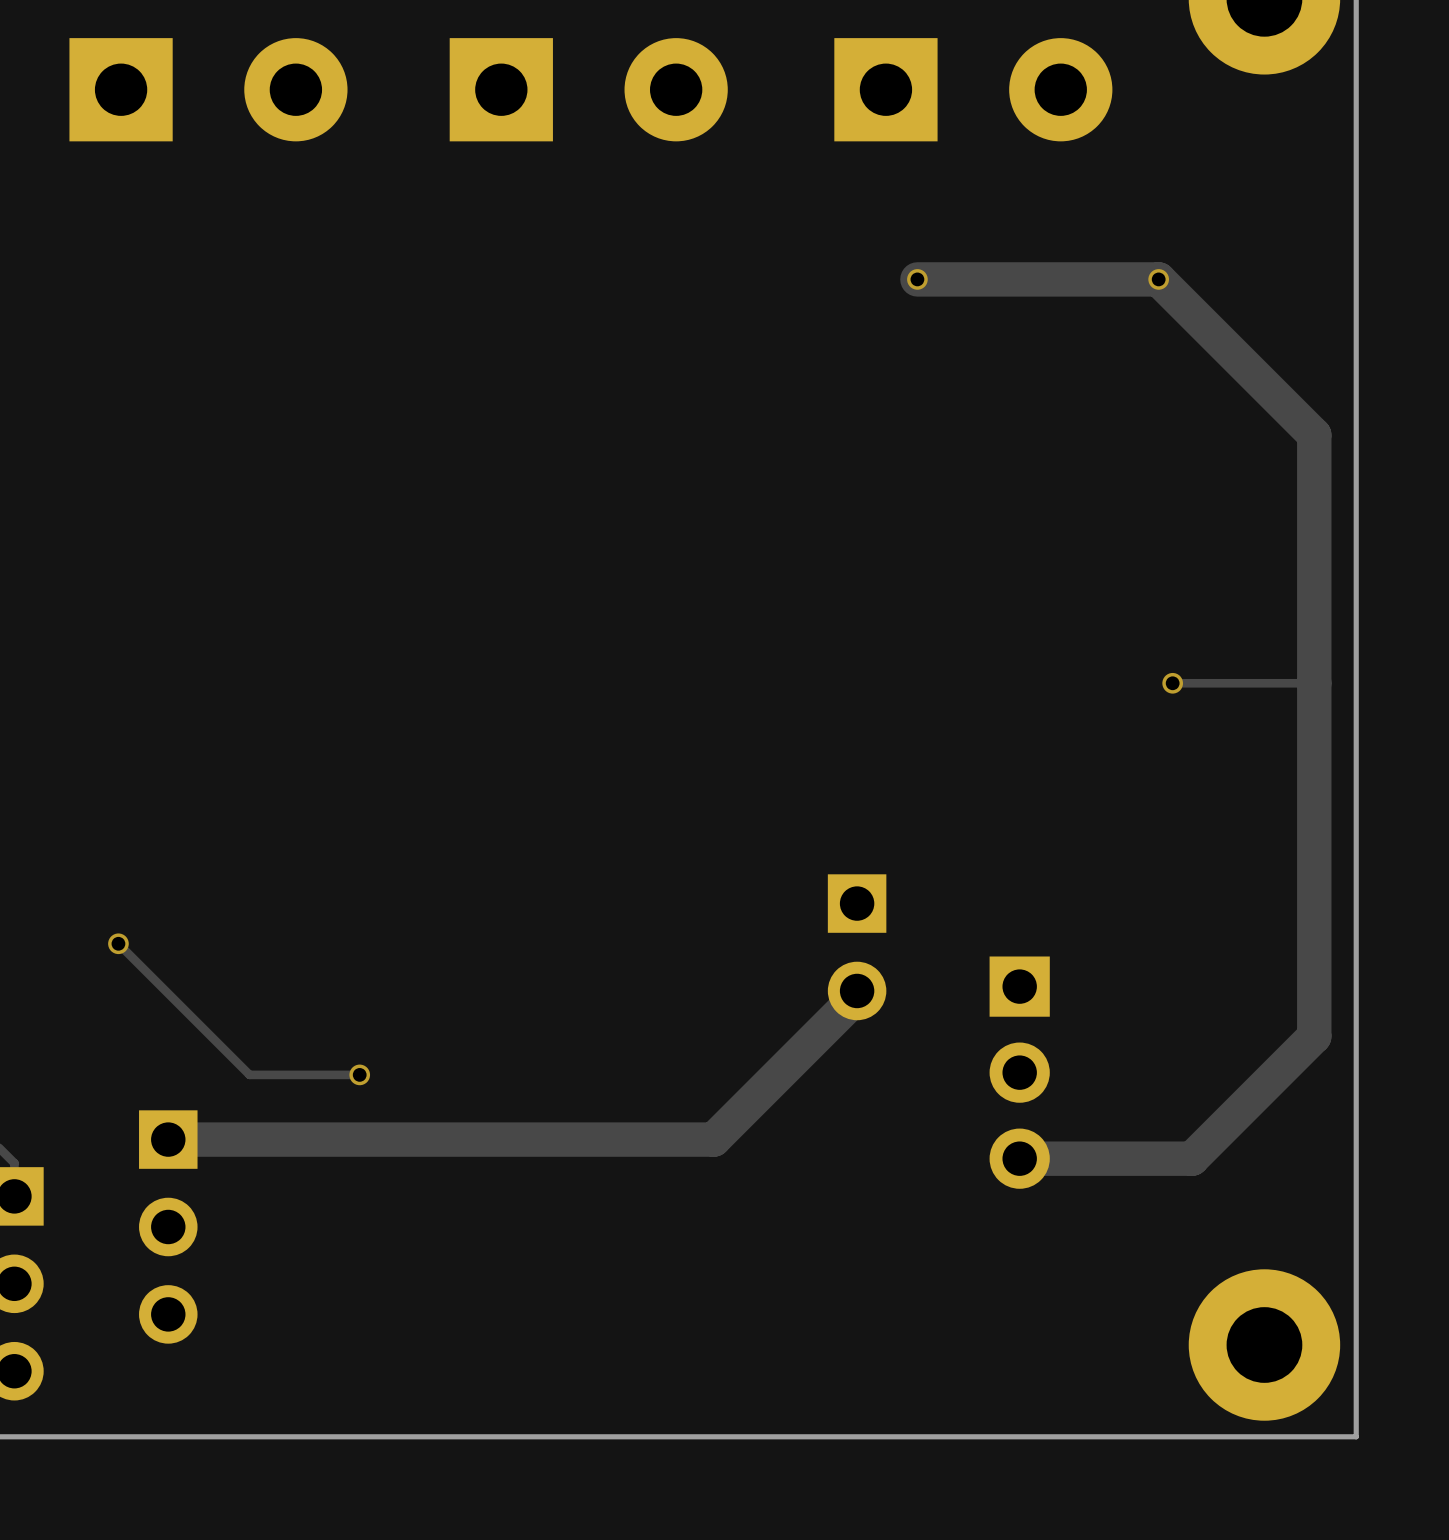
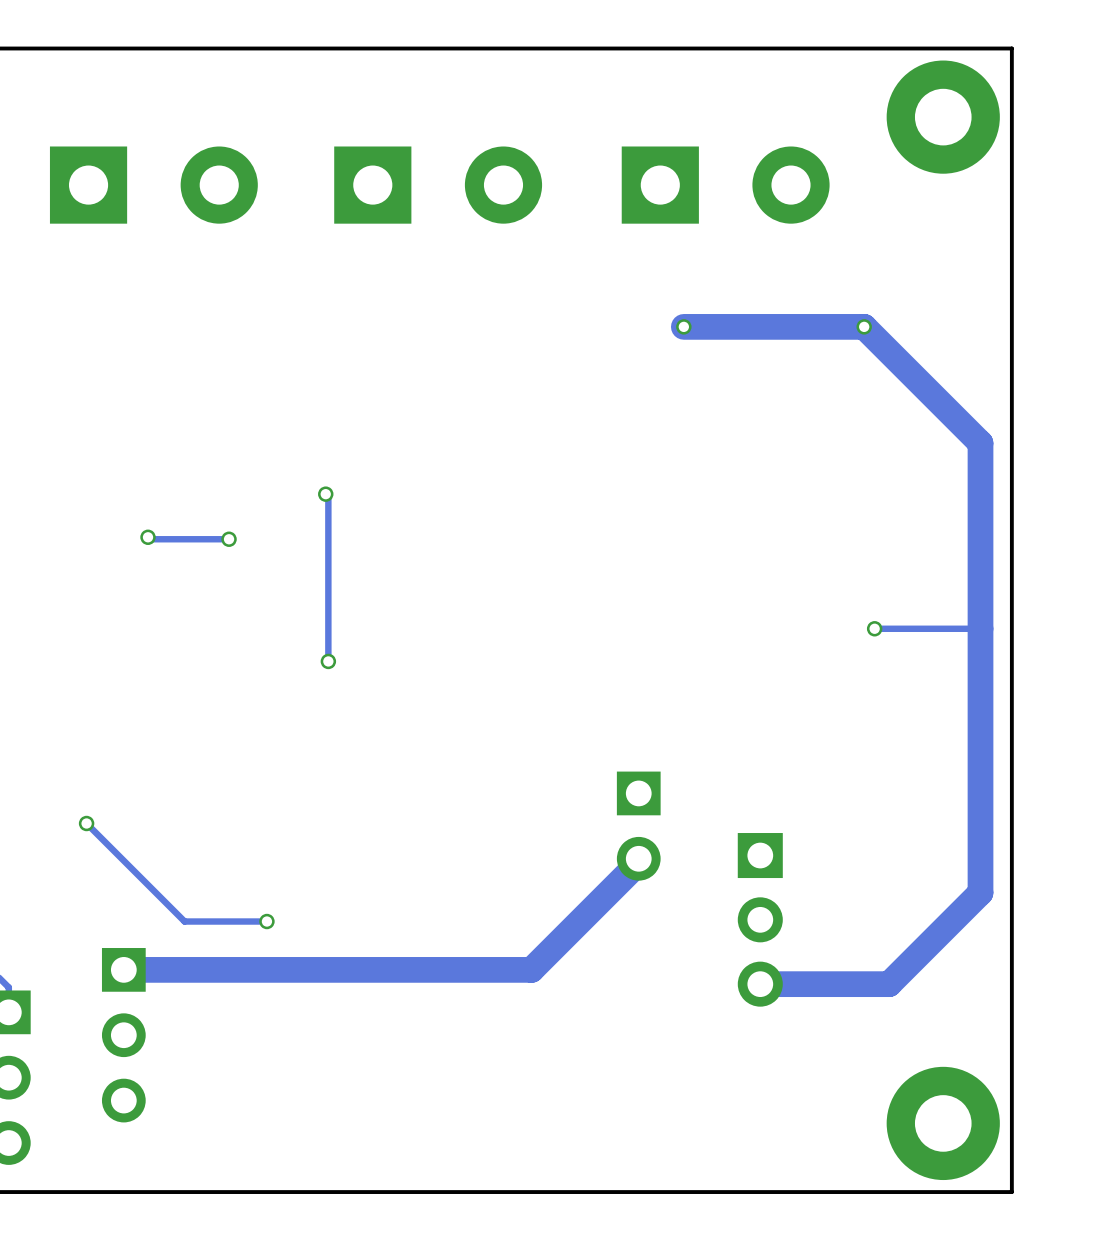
track: none -> (325, 494) (328, 496) (328, 661)
via: none -> (325, 494)
track: none -> (148, 537) (149, 539) (229, 539)
via: none -> (148, 537)
via: none -> (229, 539)
via: none -> (328, 661)

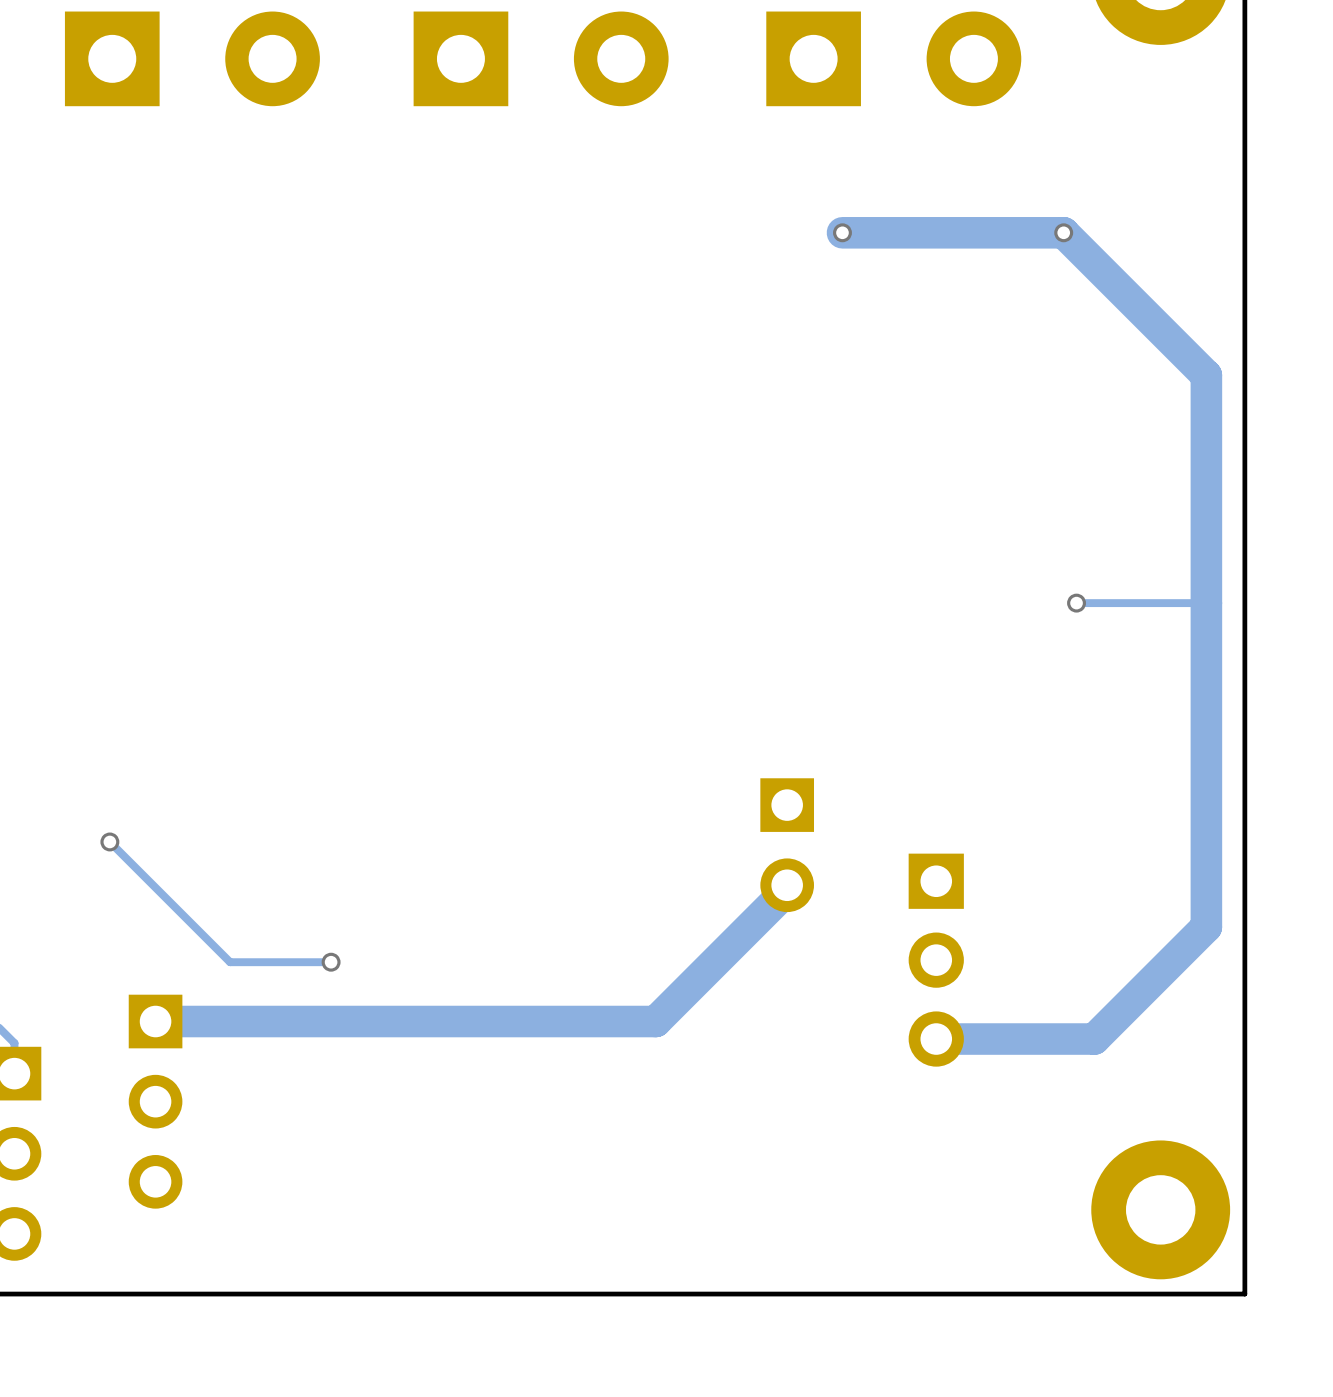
track: (325, 494) (328, 496) (328, 661) -> none
via: (325, 494) -> none
track: (148, 537) (149, 539) (229, 539) -> none
via: (148, 537) -> none
via: (229, 539) -> none
via: (328, 661) -> none

